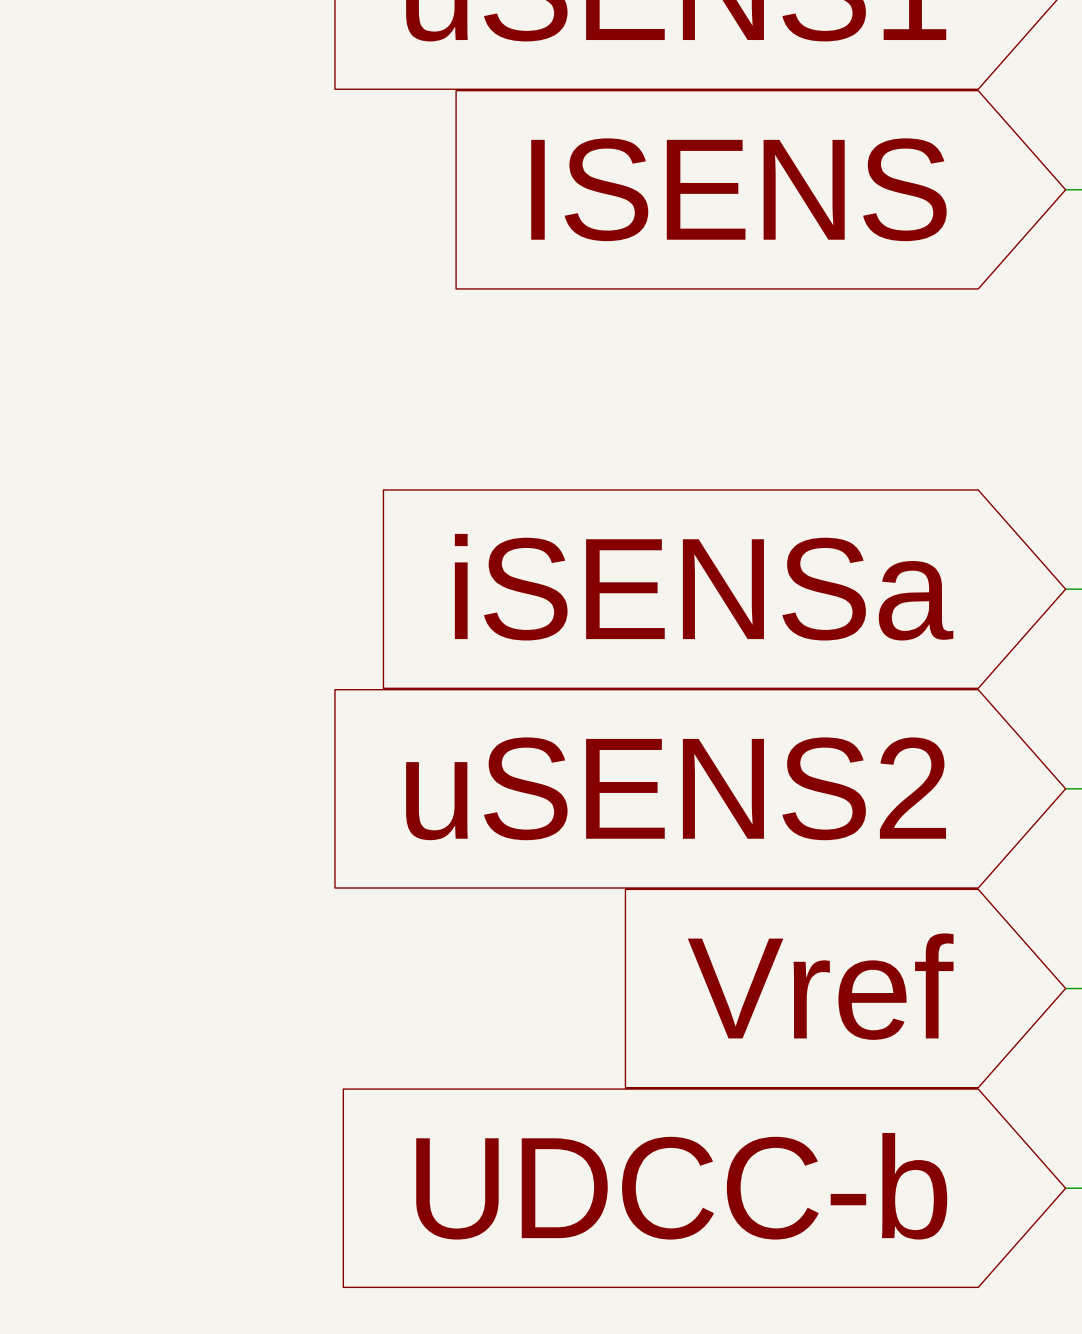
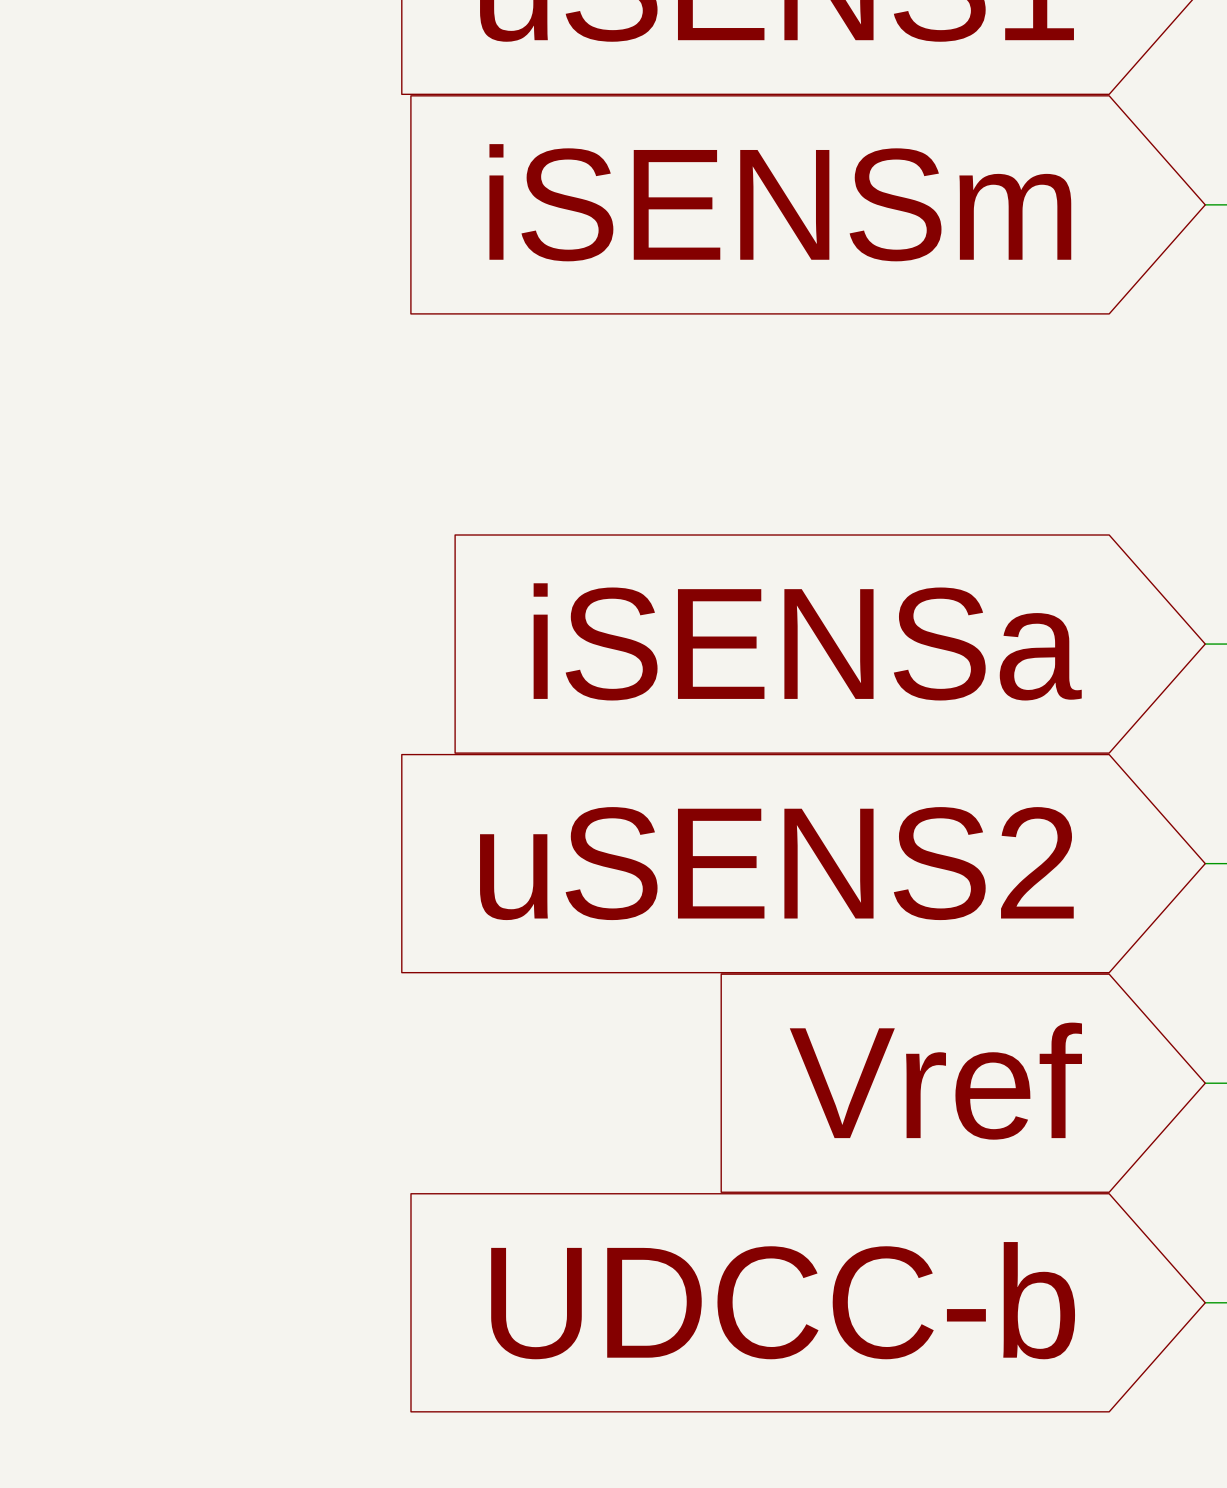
global label: ISENS (738, 189) -> iSENSm (780, 202)

